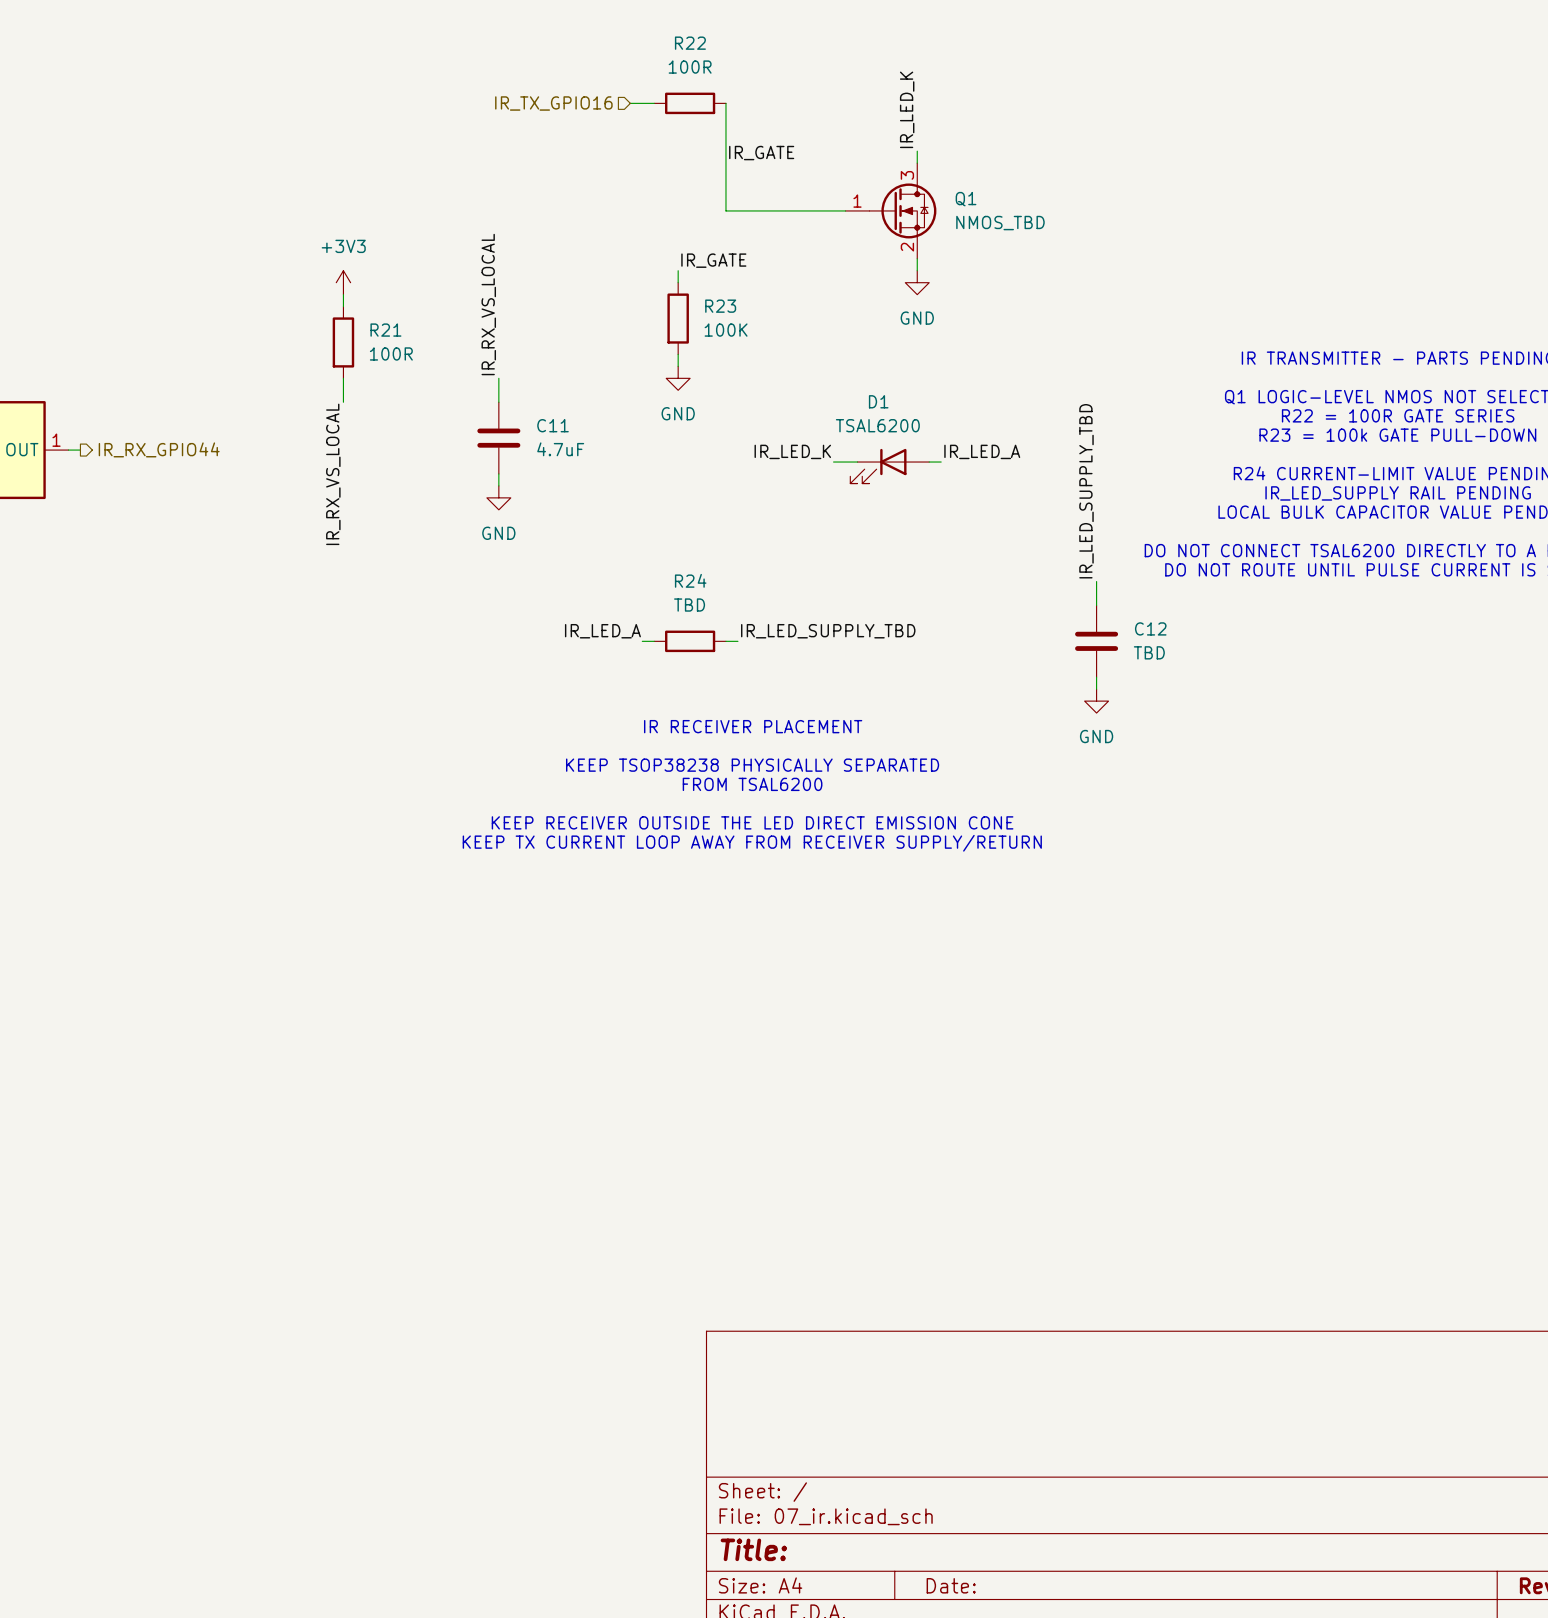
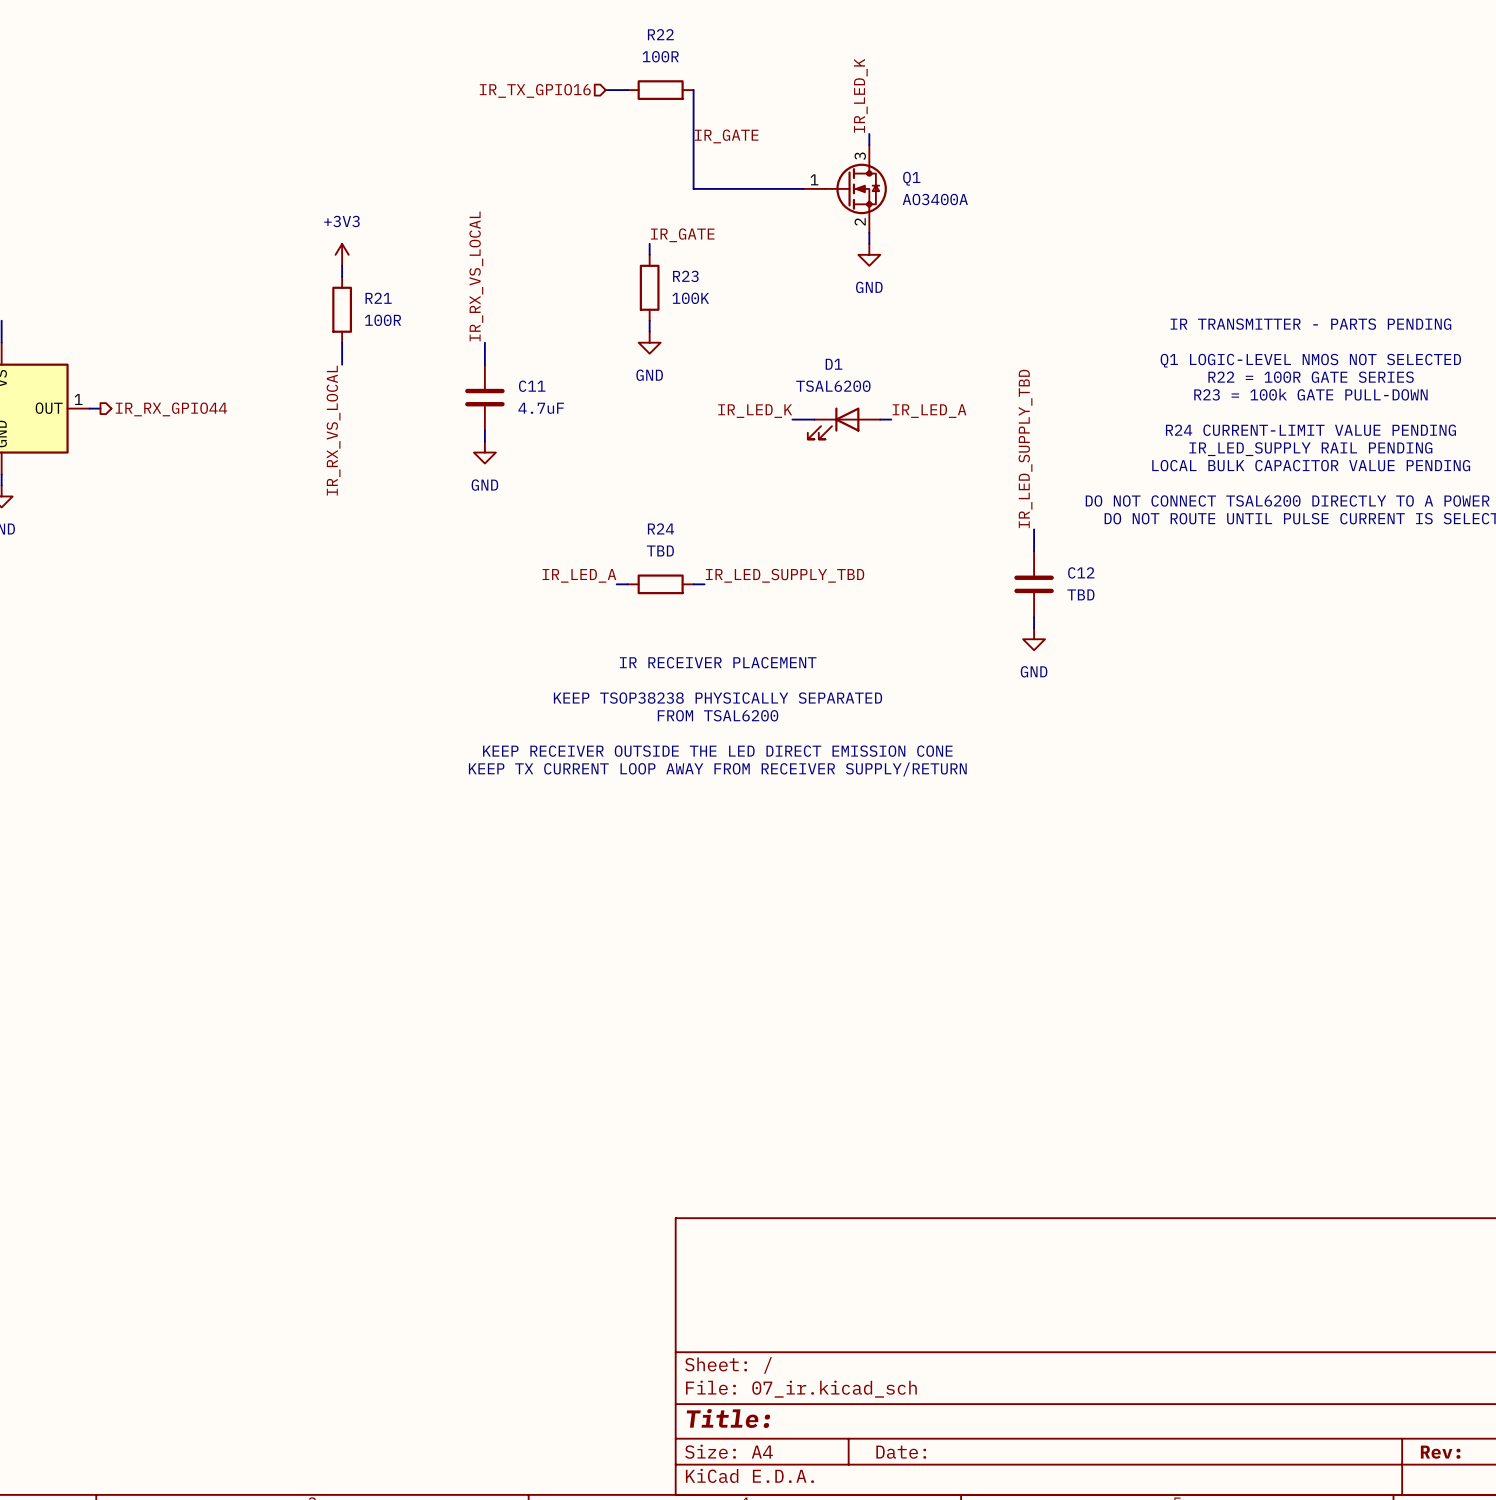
Q1 value: NMOS_TBD (1000, 223) -> AO3400A (935, 199)

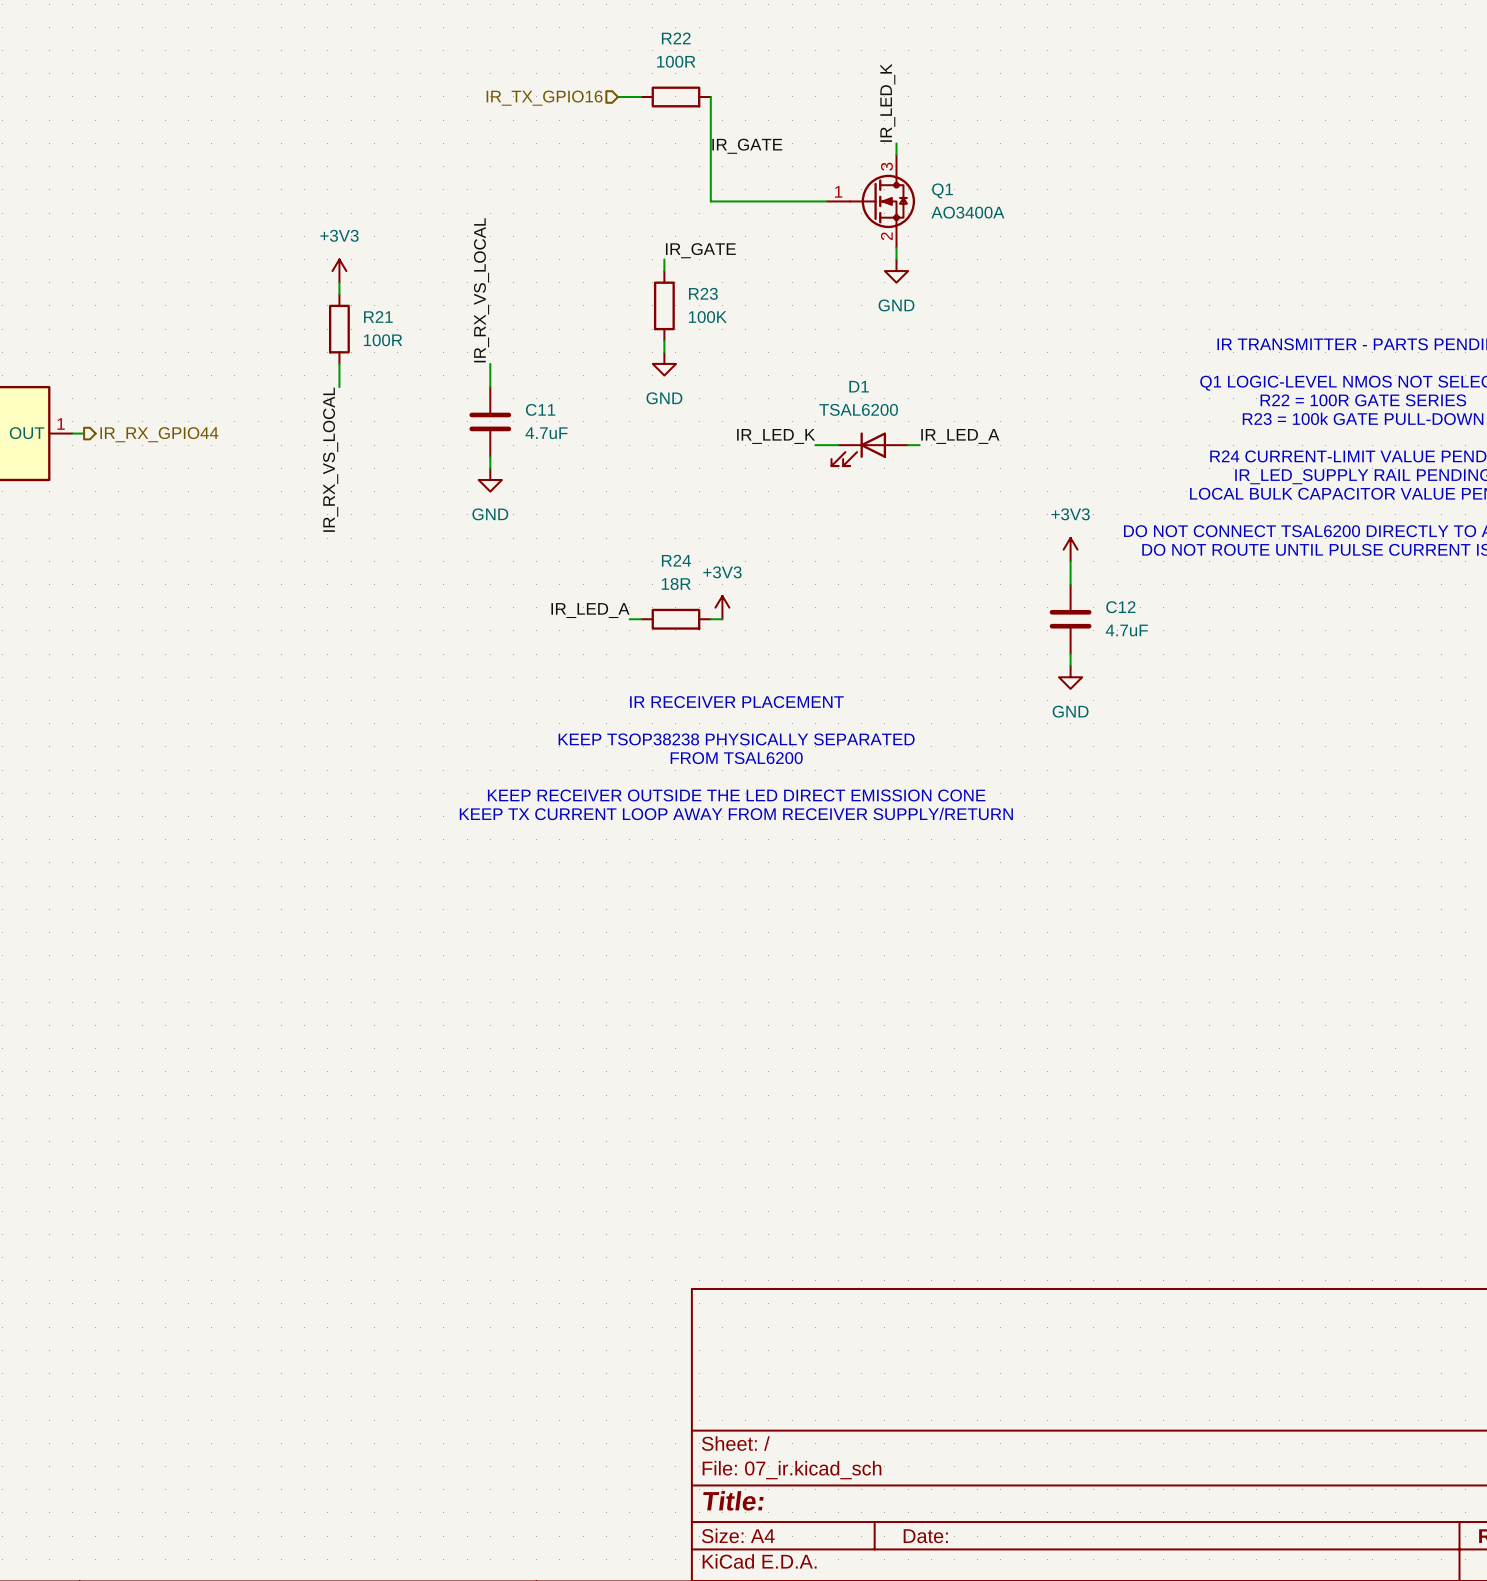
label: IR_LED_SUPPLY_TBD (1025, 448) -> none
power symbol: none -> +3V3 (1070, 549)
R24 value: TBD (660, 550) -> 18R (676, 583)
power symbol: none -> +3V3 (722, 607)
label: IR_LED_SUPPLY_TBD (785, 575) -> none
C12 value: TBD (1080, 594) -> 4.7uF (1126, 630)

